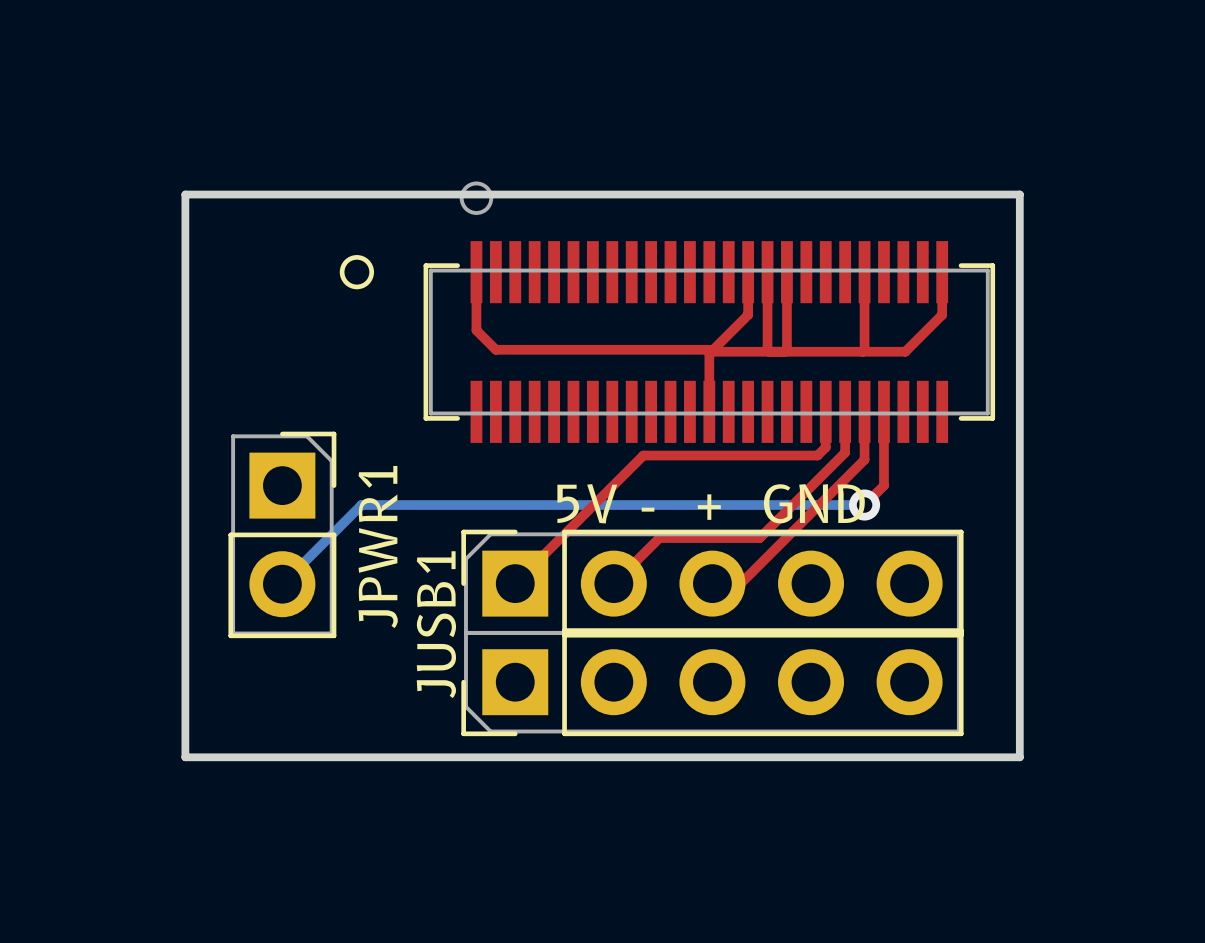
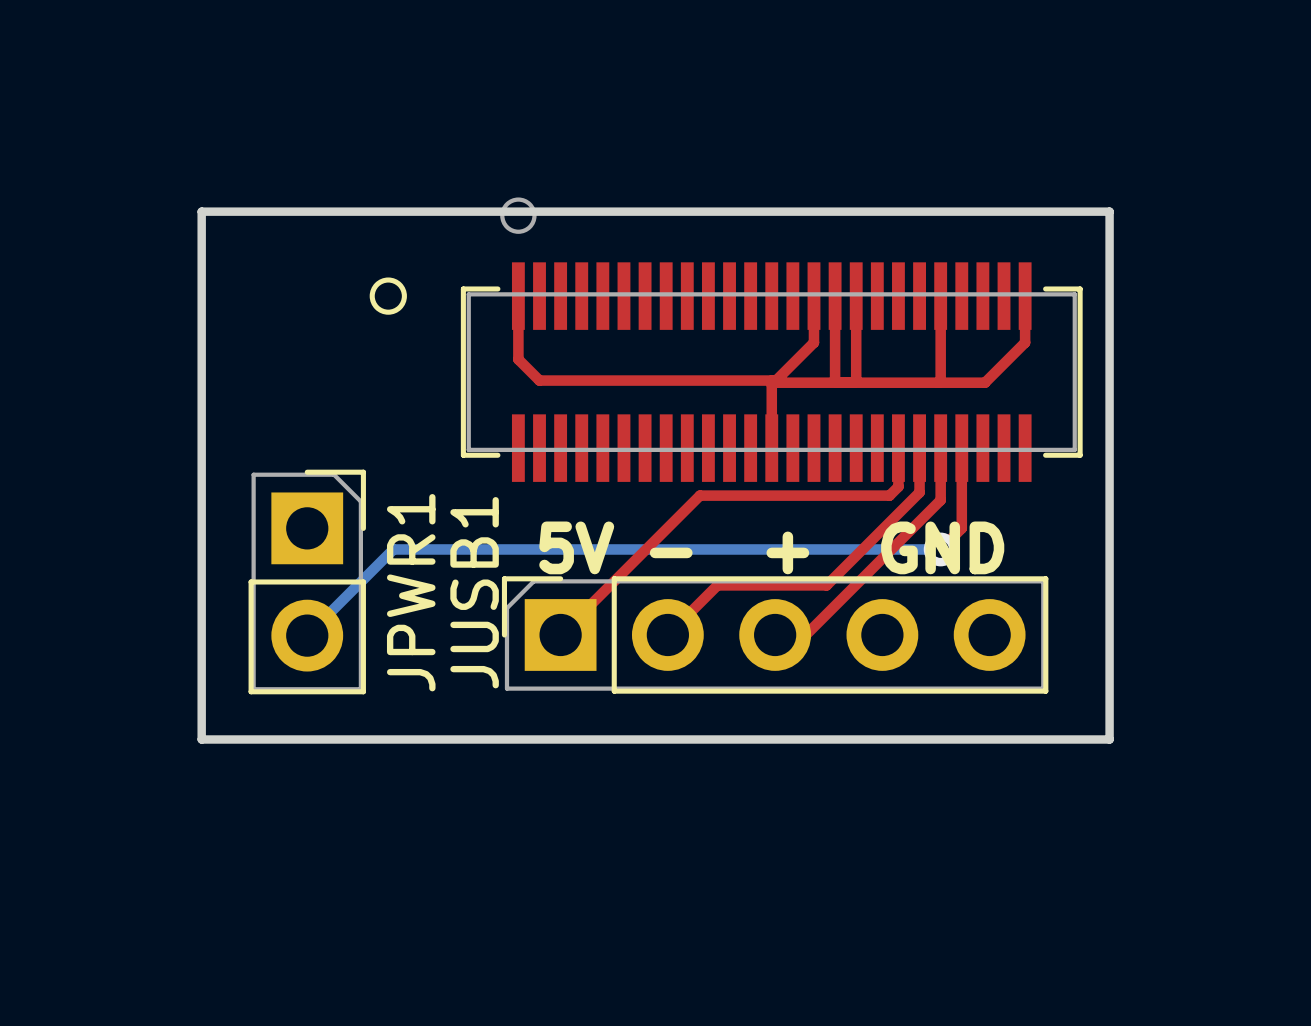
JUSB1 name position: JUSB1 (436, 624) -> JUSB1 (474, 592)
board edge: (185, 679) (185, 757) (1019, 757) (1019, 679) -> (201, 739) (1109, 739)
part: (712, 682) -> none

